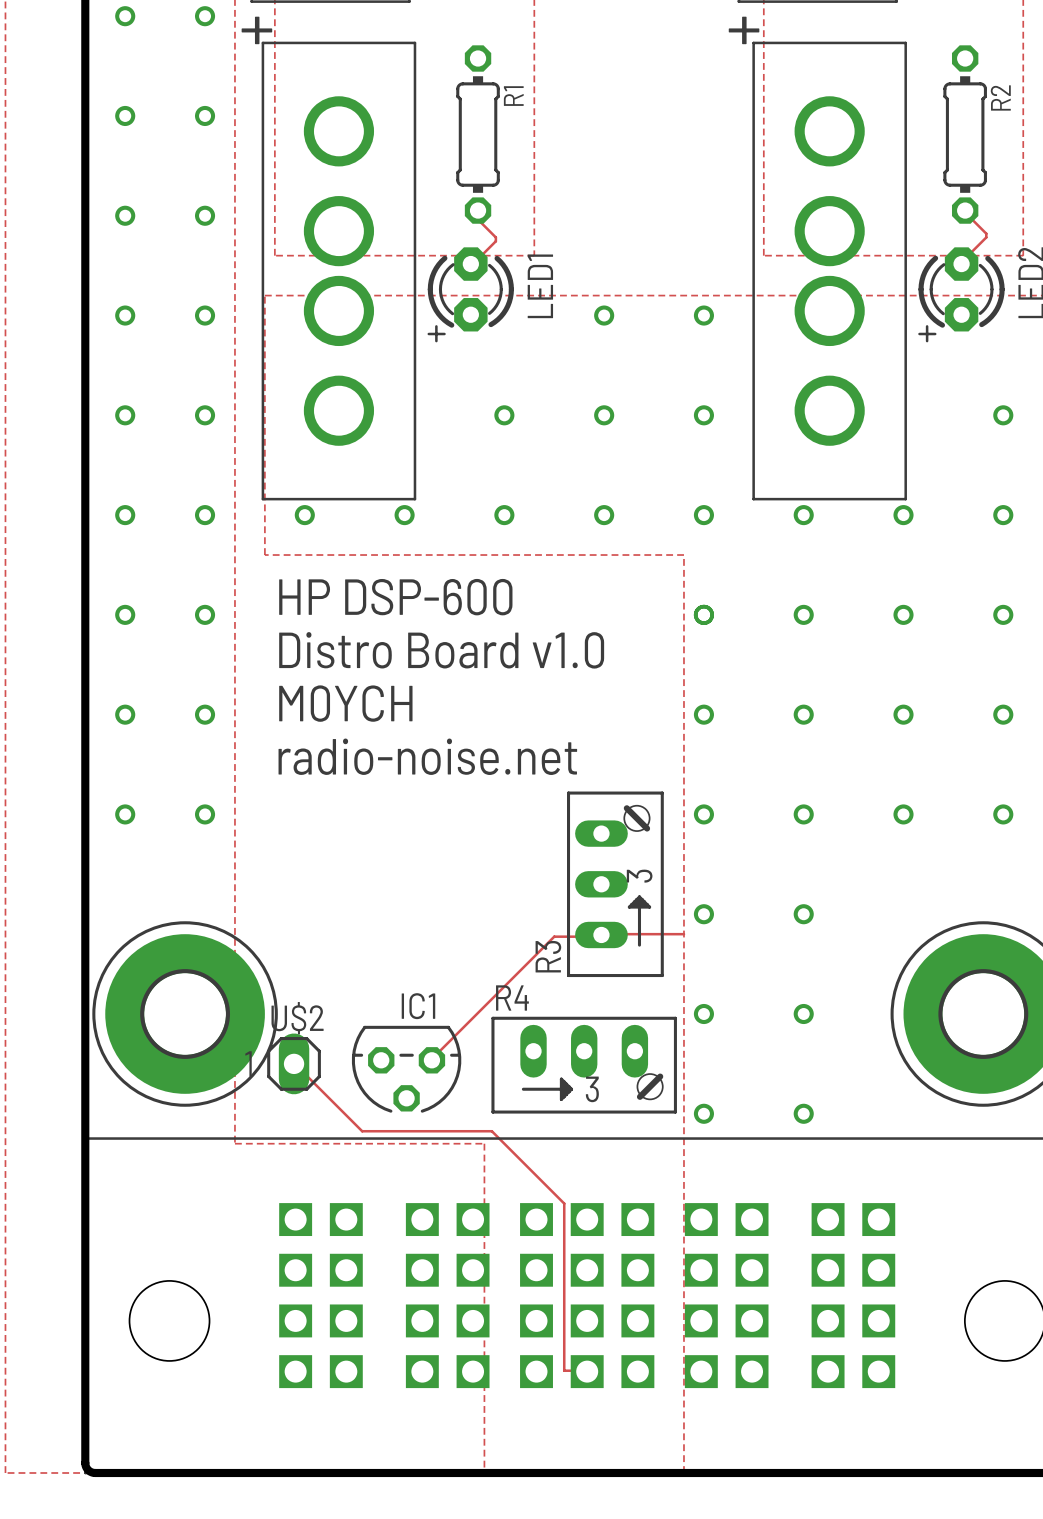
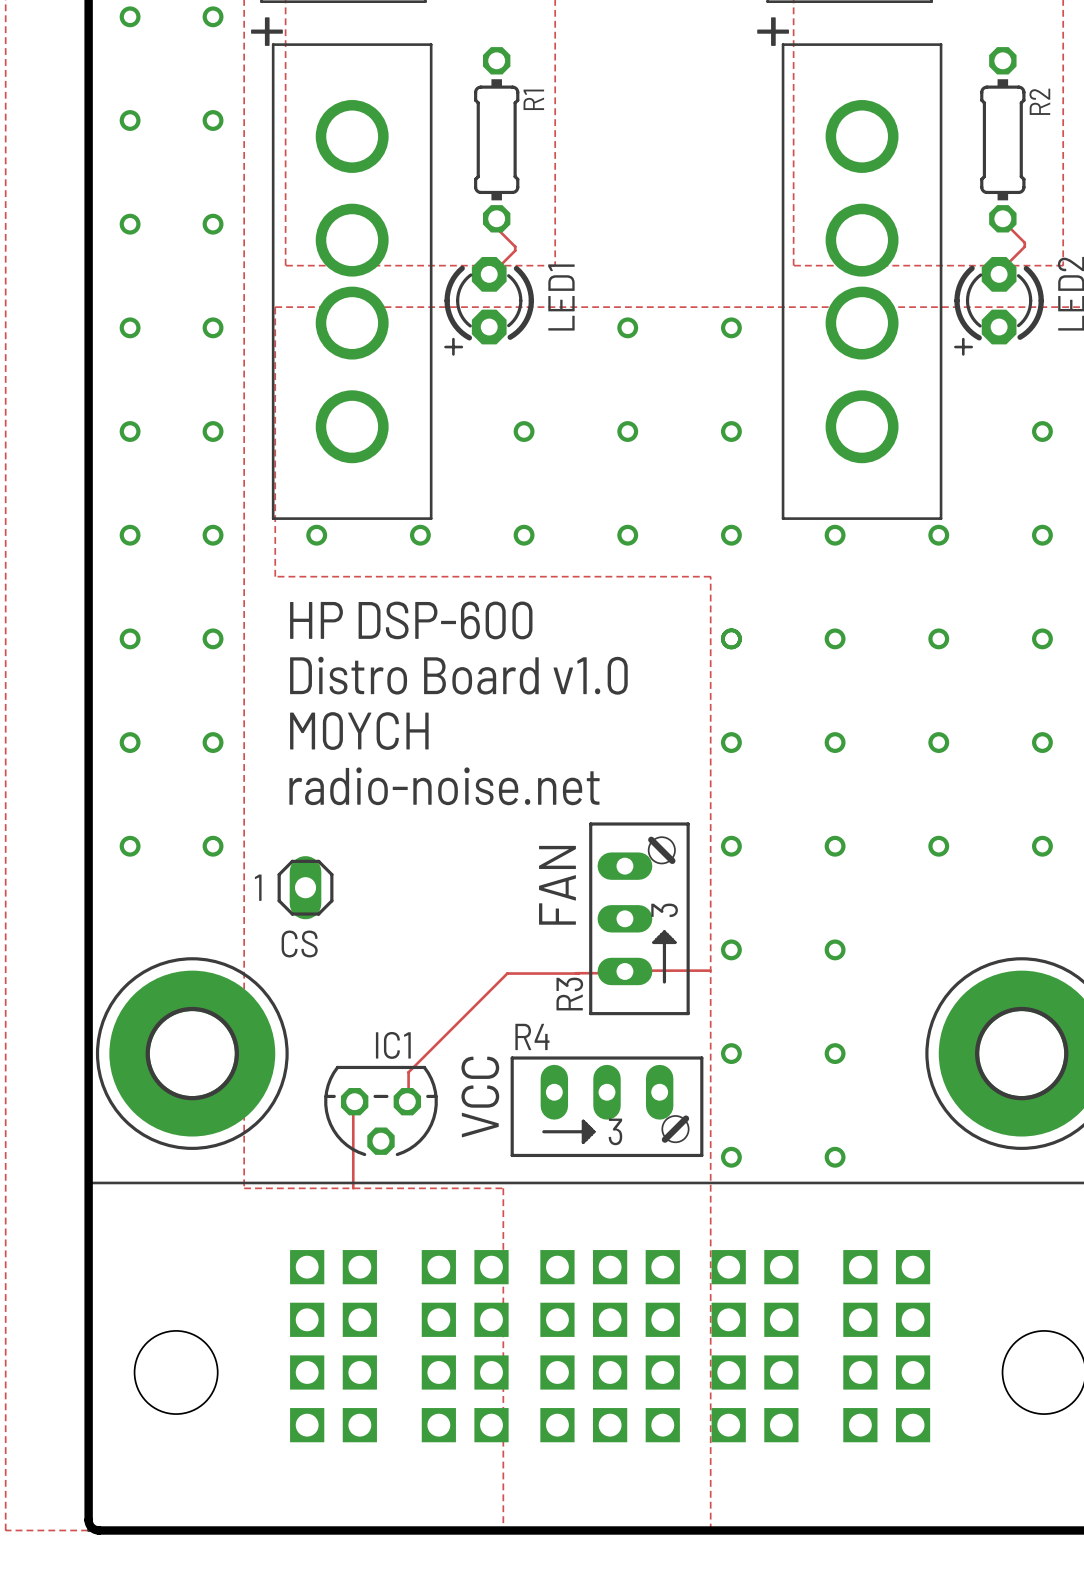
text: none -> FAN (557, 885)
CS: none -> (305, 887)
track: (554, 936) (431, 1060) -> none
track: none -> (578, 973) (507, 973) (408, 1072) (407, 1101)
text: none -> VCC (480, 1097)
track: none -> (354, 1101) (353, 1188)
track: (294, 1063) (362, 1131) (491, 1131) (564, 1203) (564, 1370) (587, 1371) -> none
U$2: (294, 1063) -> none
IC1 position: (406, 1069) -> (380, 1110)

